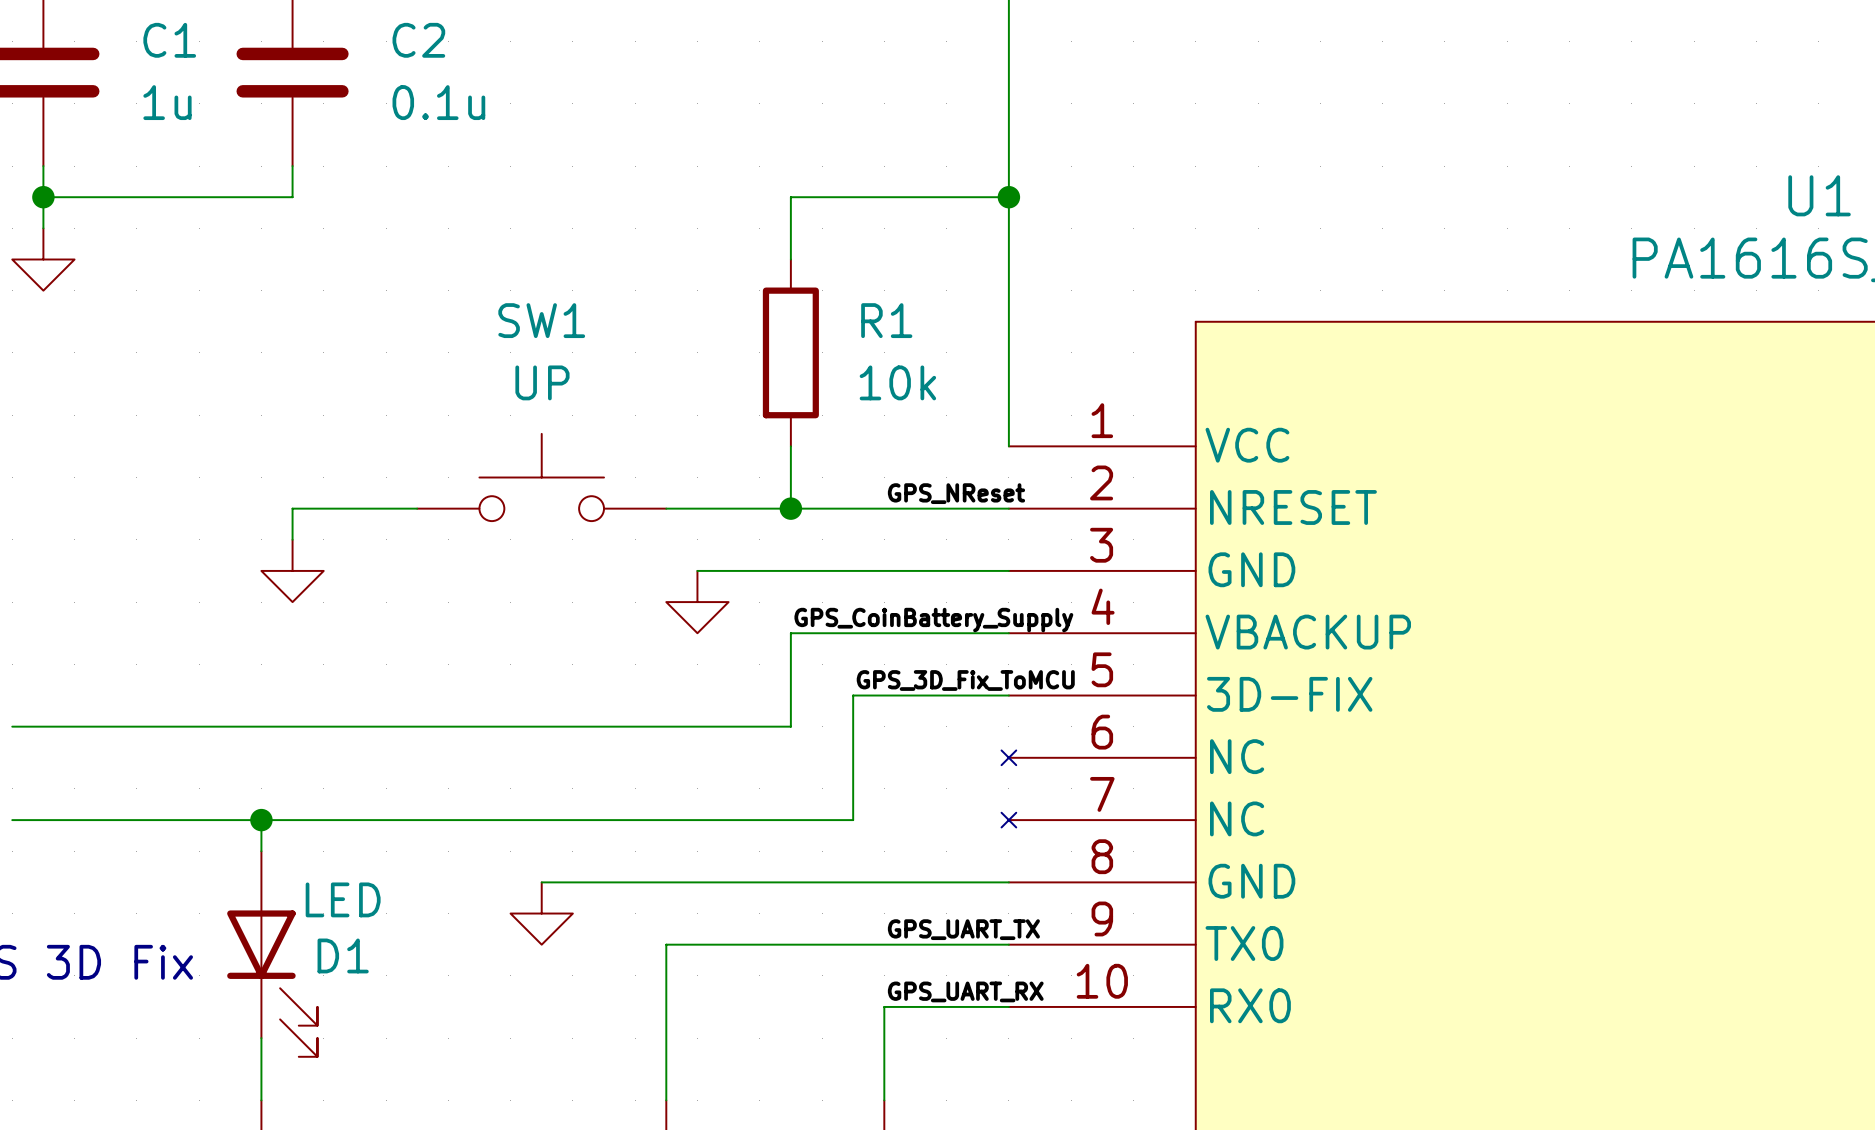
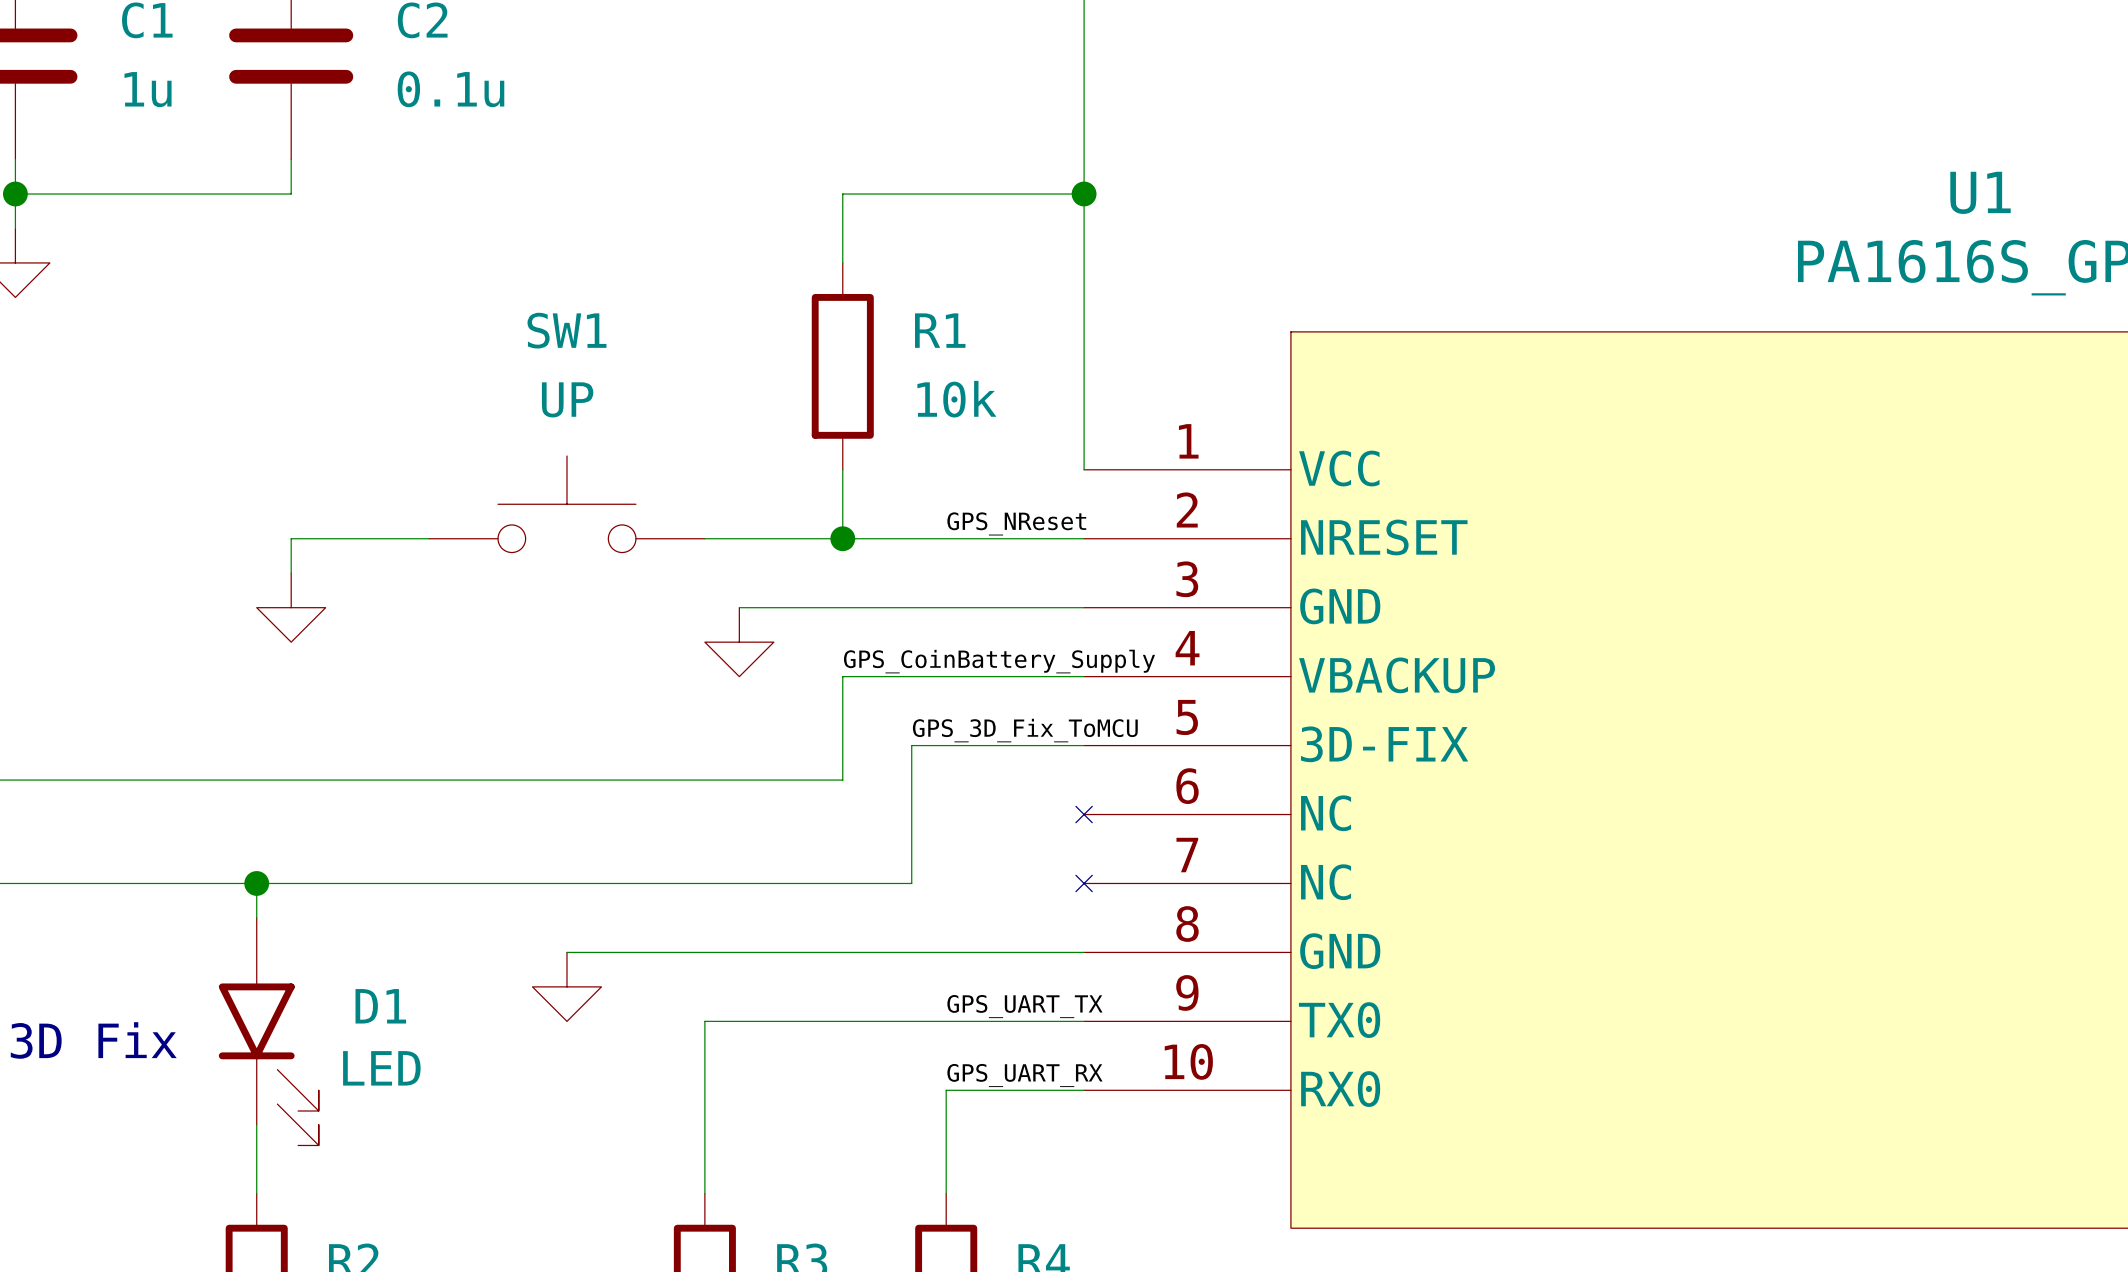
D1 symbol: [227, 851, 318, 1057] -> [218, 917, 319, 1146]
D1 value position: LED (343, 899) -> LED (381, 1068)
D1 name position: D1 (343, 955) -> D1 (380, 1006)

